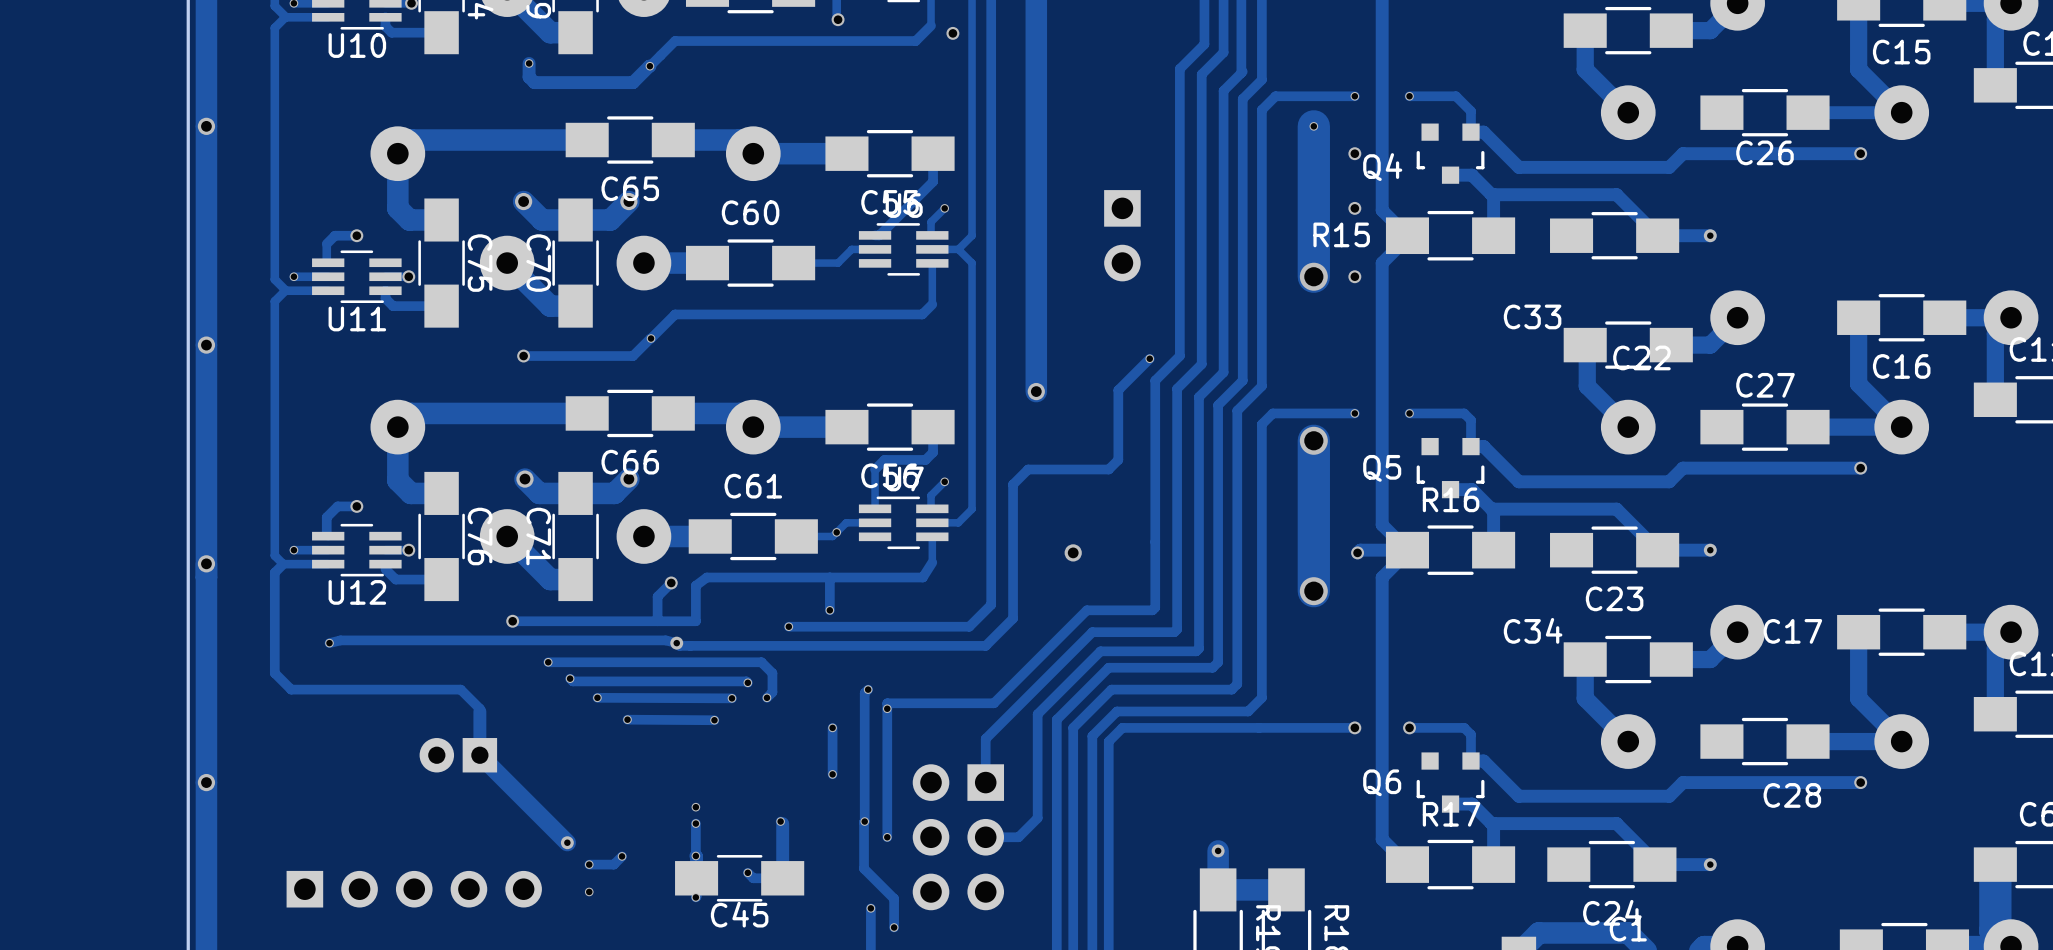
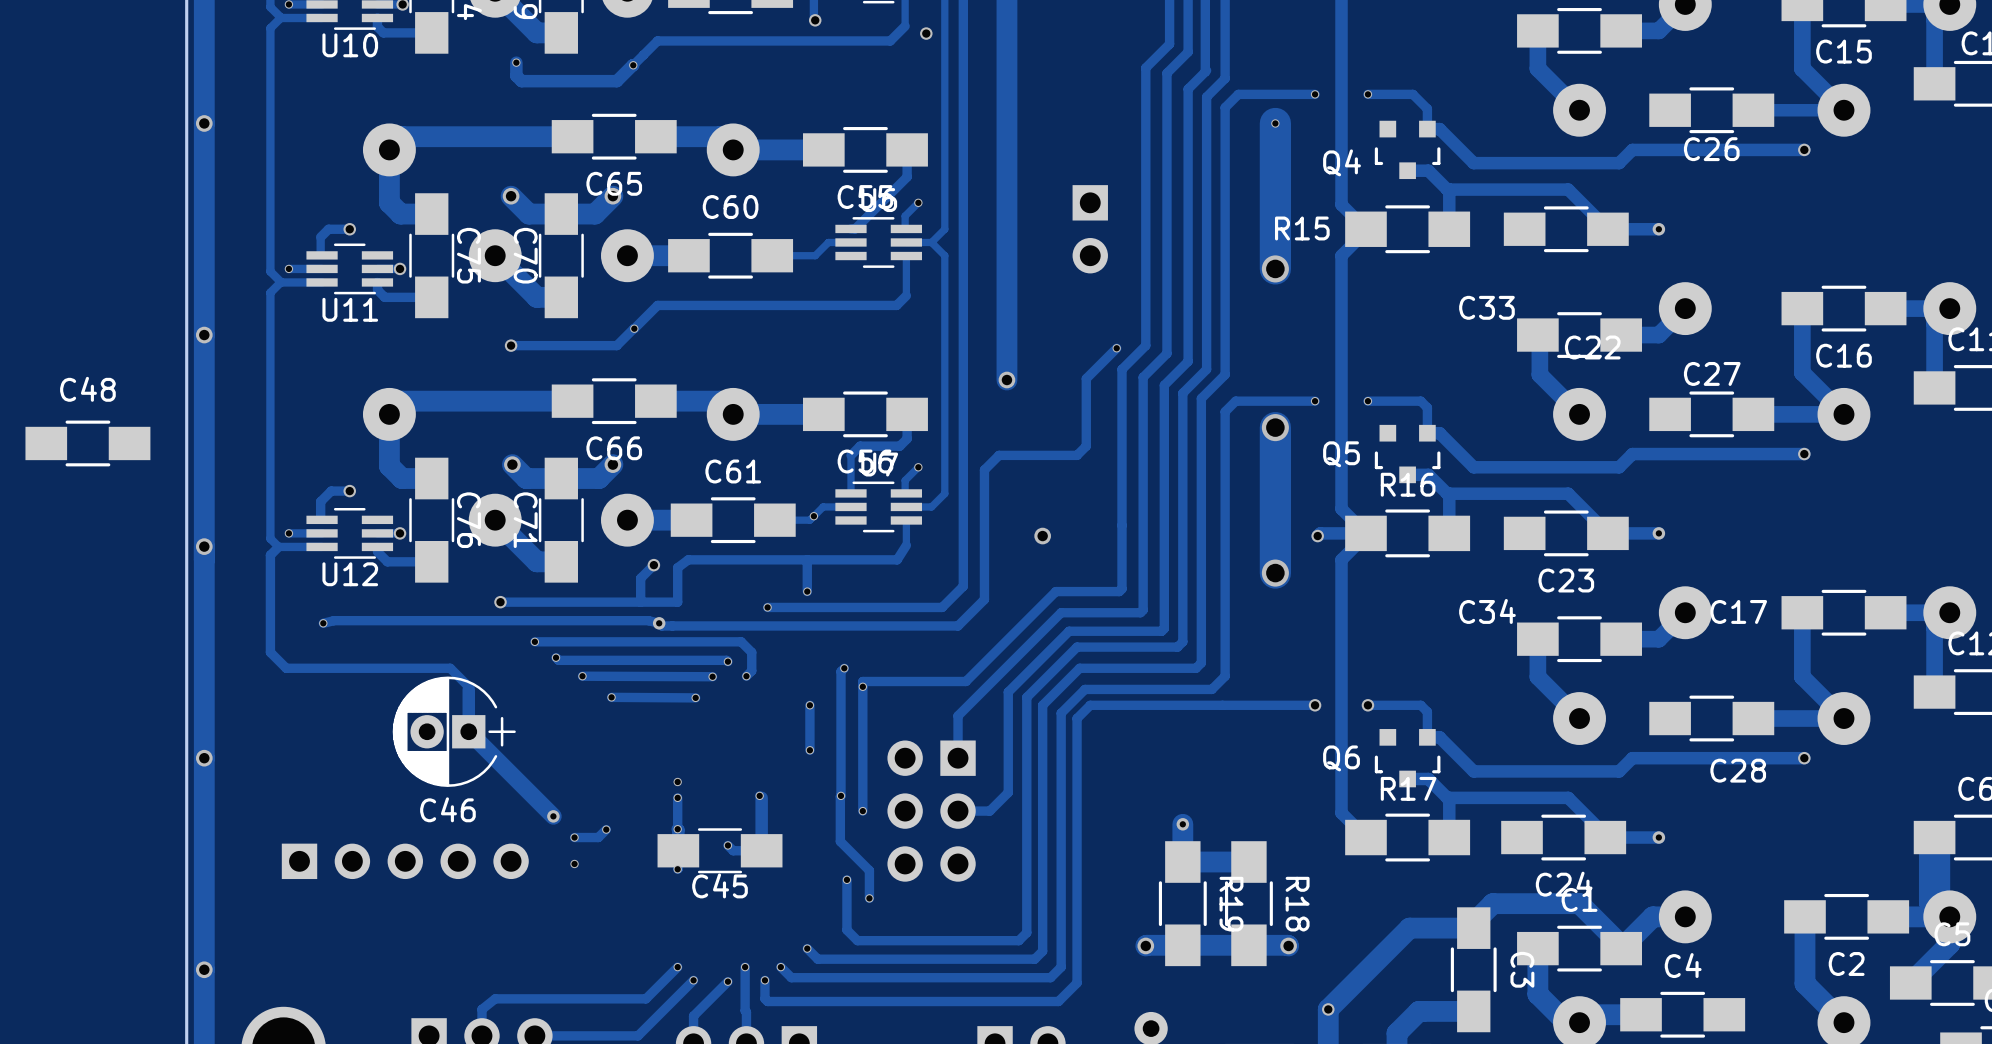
via: (1354, 153) -> none
via: (1354, 208) -> none
via: (1354, 276) -> none
C48: none -> (87, 443)
C46 side: top (458, 755) -> bottom (454, 731)

